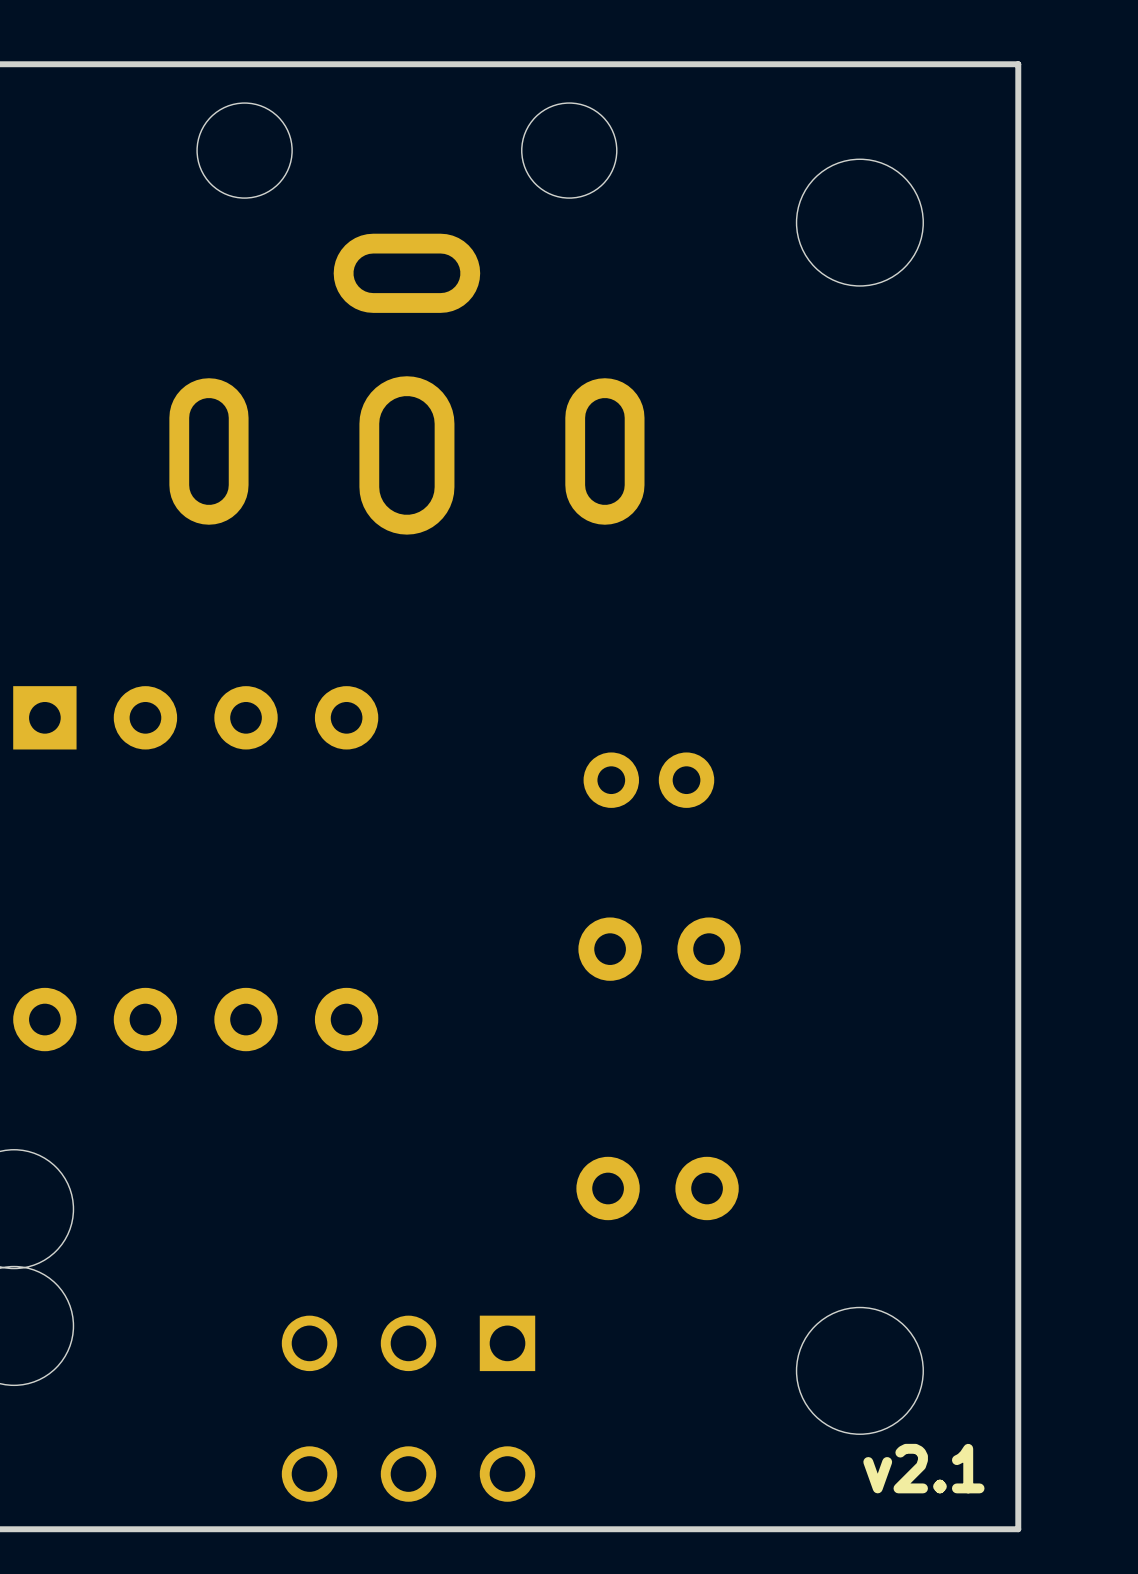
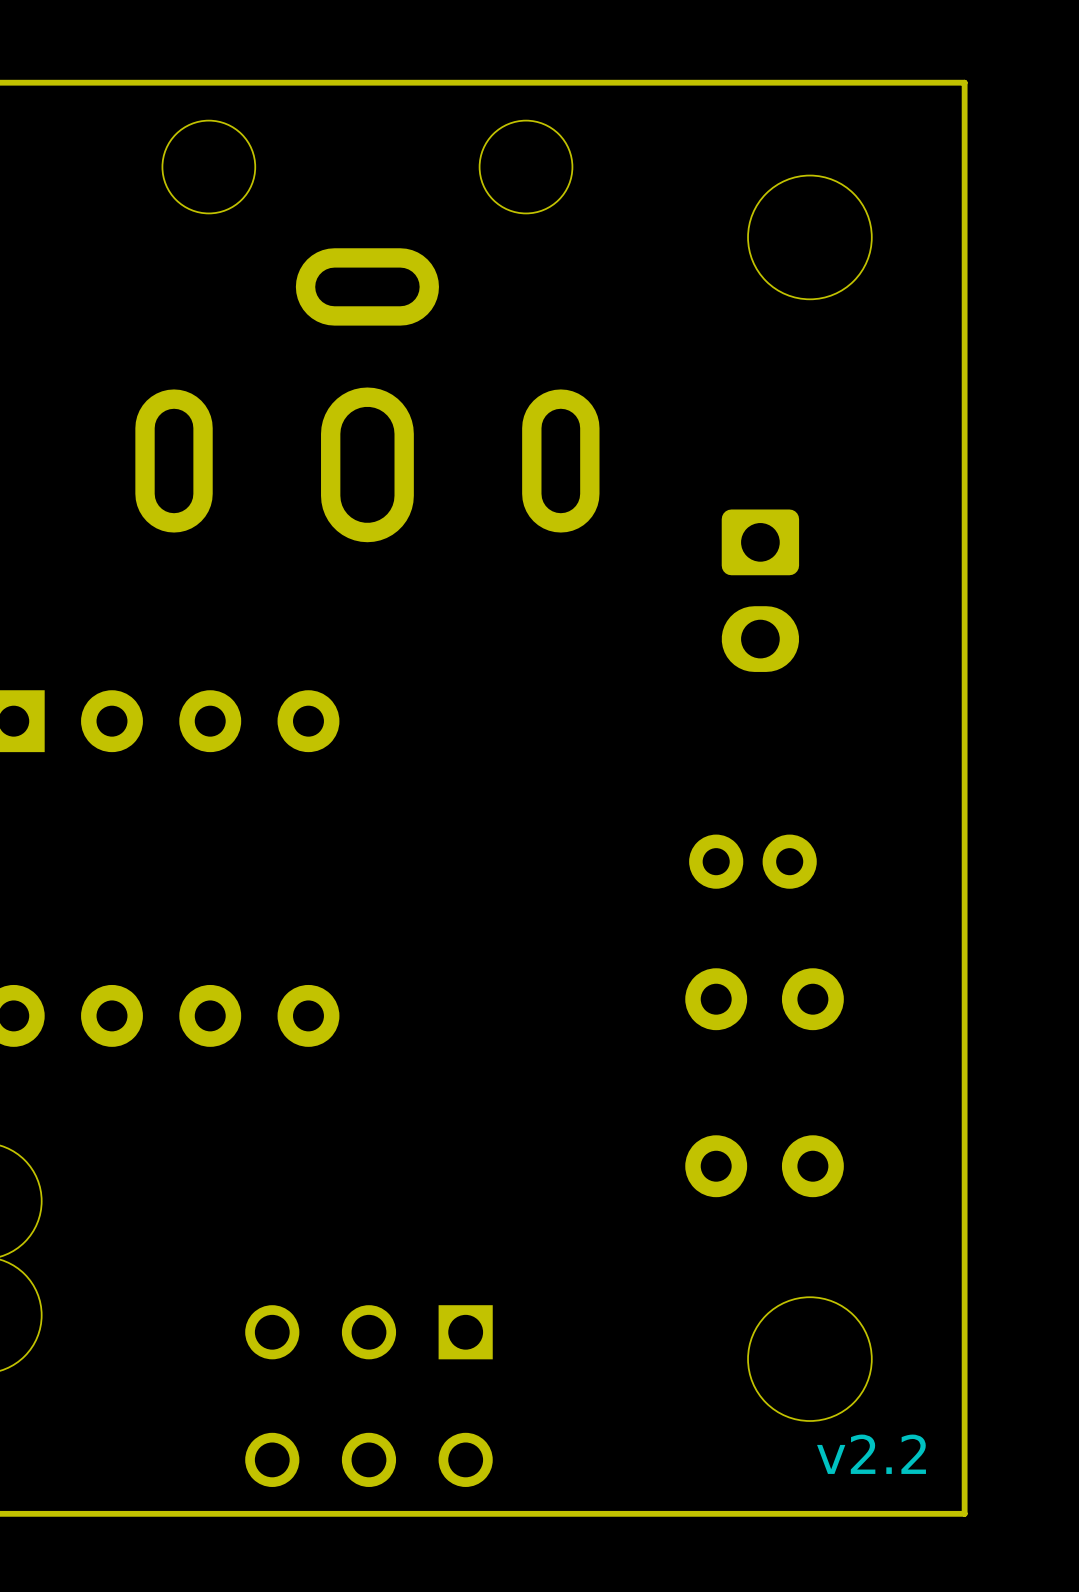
part: none -> (760, 590)
part position: (648, 780) -> (752, 861)
part: (659, 949) -> none
part: none -> (764, 999)
part: none -> (764, 1166)
part: (657, 1188) -> none
text: v2.1 (923, 1468) -> v2.2 (871, 1454)

